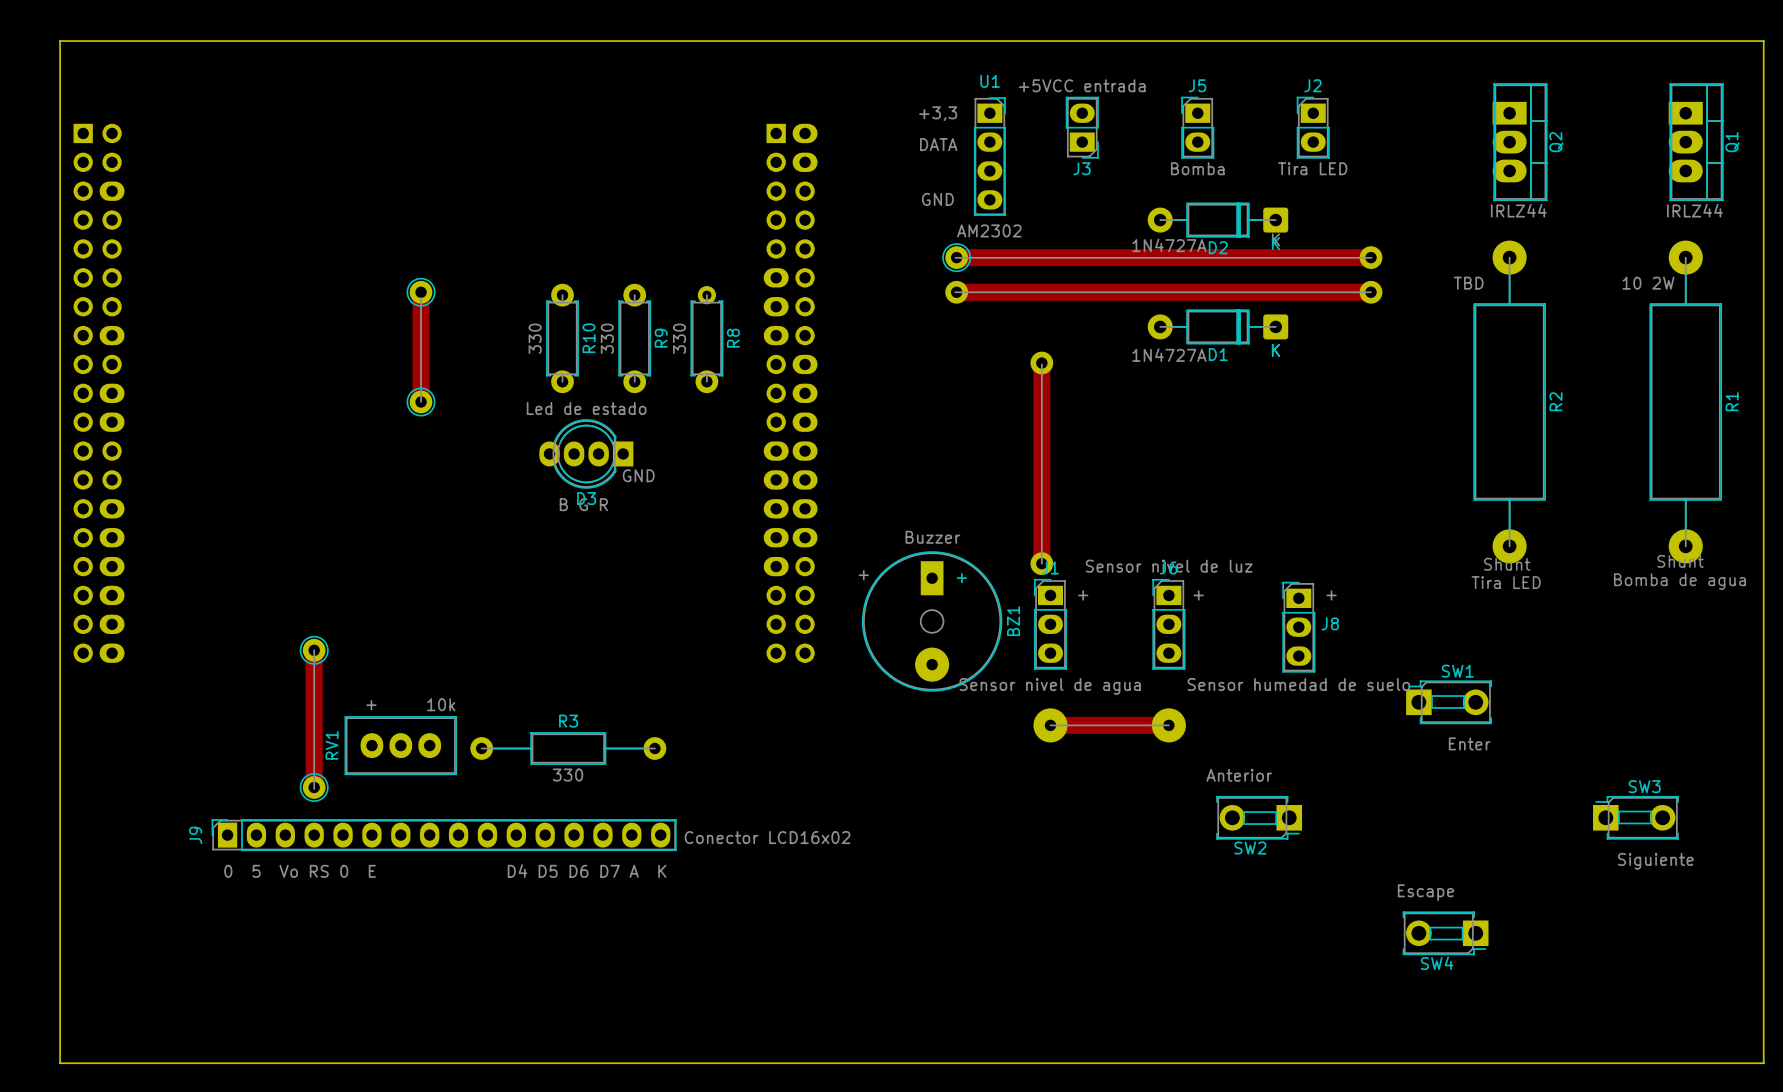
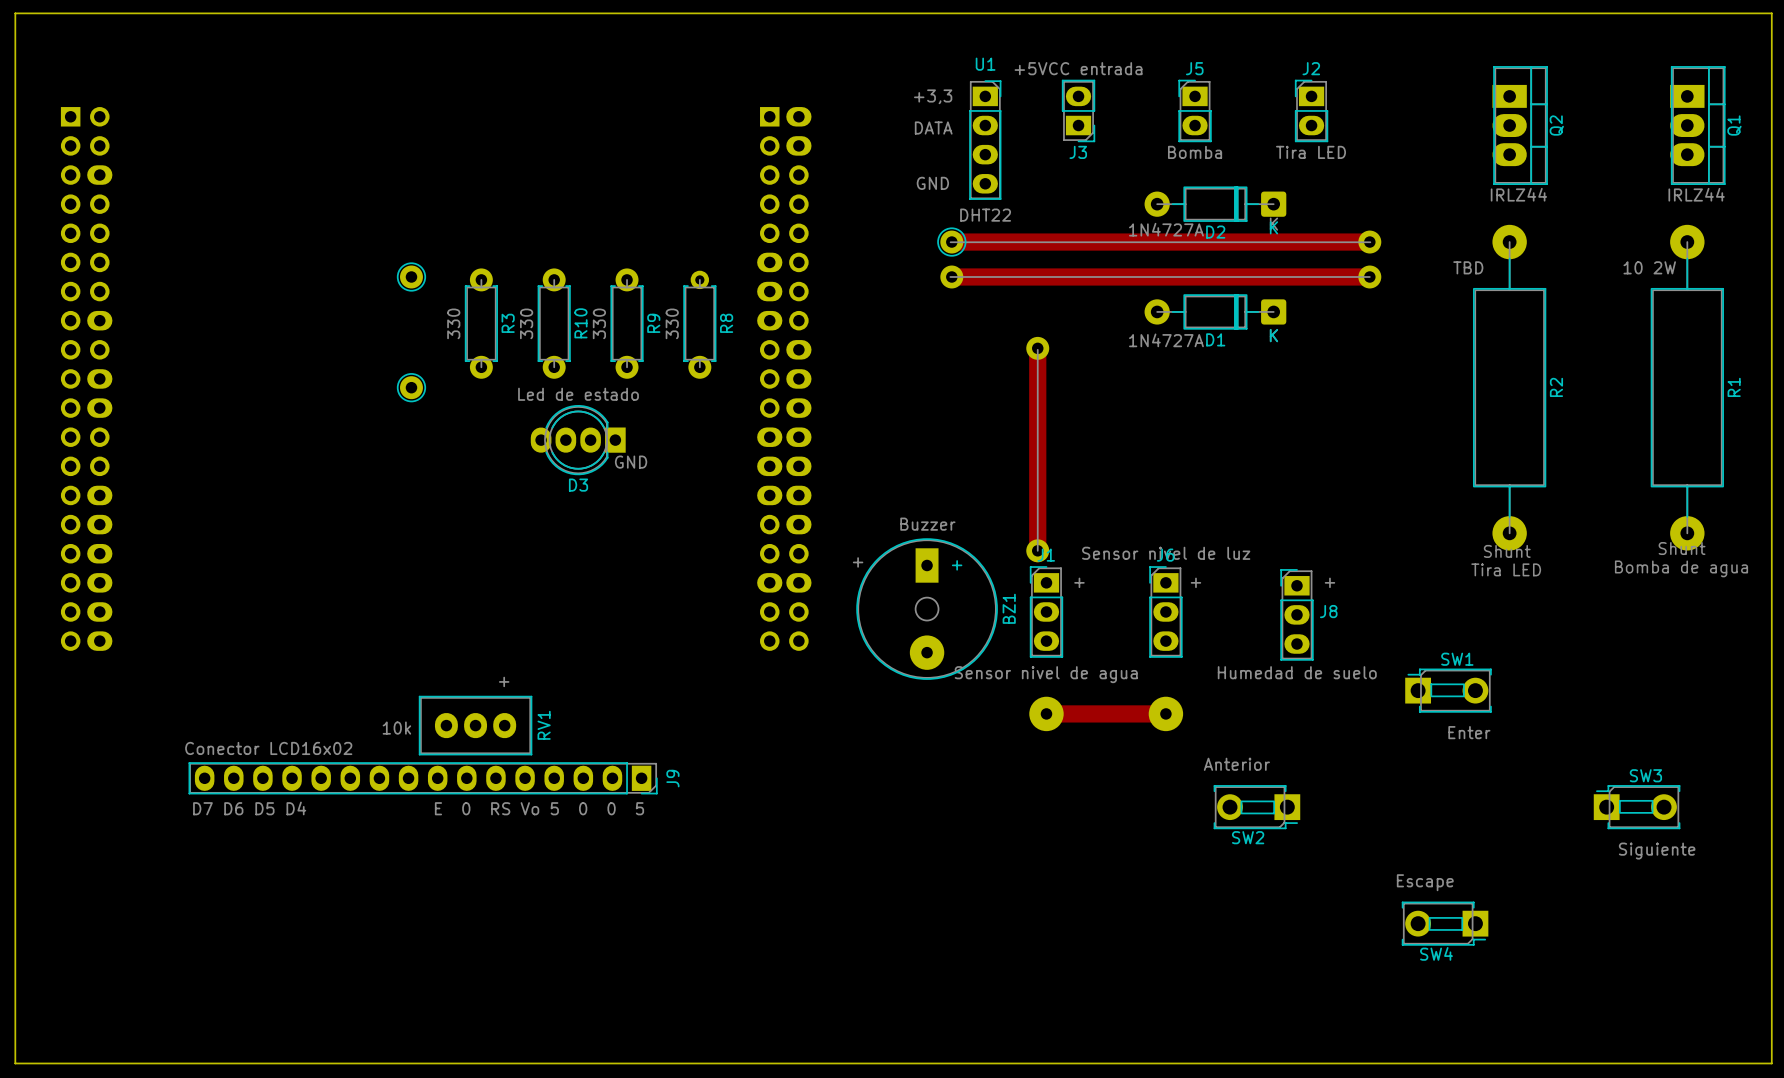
board edge: (60, 41) (1763, 41) (1763, 1063) (60, 1063) (60, 41) -> (15, 13) (15, 1063) (1771, 1063) (1771, 13) (15, 13)
part footprint: [763, 123, 818, 663] -> [757, 107, 812, 651]
U1 value: AM2302 (989, 230) -> DHT22 (985, 215)
track: (421, 292) (421, 401) -> none
line: (421, 298) (421, 401) -> none
text: B G R (583, 504) -> none
line: (314, 650) (314, 788) -> none
track: (314, 650) (314, 787) -> none
part: (314, 650) -> none
J8 value: Sensor humedad de suelo (1298, 684) -> Humedad de suelo (1297, 672)
RV1 value position: 10k (441, 704) -> 10k (396, 728)
text position: + (371, 705) -> + (504, 681)
R3 name position: R3 (568, 721) -> R3 (508, 323)
line: (1050, 725) (1168, 725) -> none
R3 footprint: [470, 732, 667, 765] -> [464, 268, 498, 379]
RV1 name position: RV1 (332, 745) -> RV1 (544, 725)
RV1 position: (400, 745) -> (475, 725)
R3 value position: 330 (568, 775) -> 330 (453, 323)
part: (314, 787) -> none
text: none -> D7 D6 D5 D4 (249, 808)
text: none -> E 0 RS Vo 5 0 0 5 (539, 808)
J9 rotation: 0° (444, 835) -> 180° (423, 778)
J9 value position: Conector LCD16x02 (767, 837) -> Conector LCD16x02 (268, 748)
text: 0 5 Vo RS 0 E (300, 871) -> none
text: D4 D5 D6 D7 A K (587, 871) -> none

